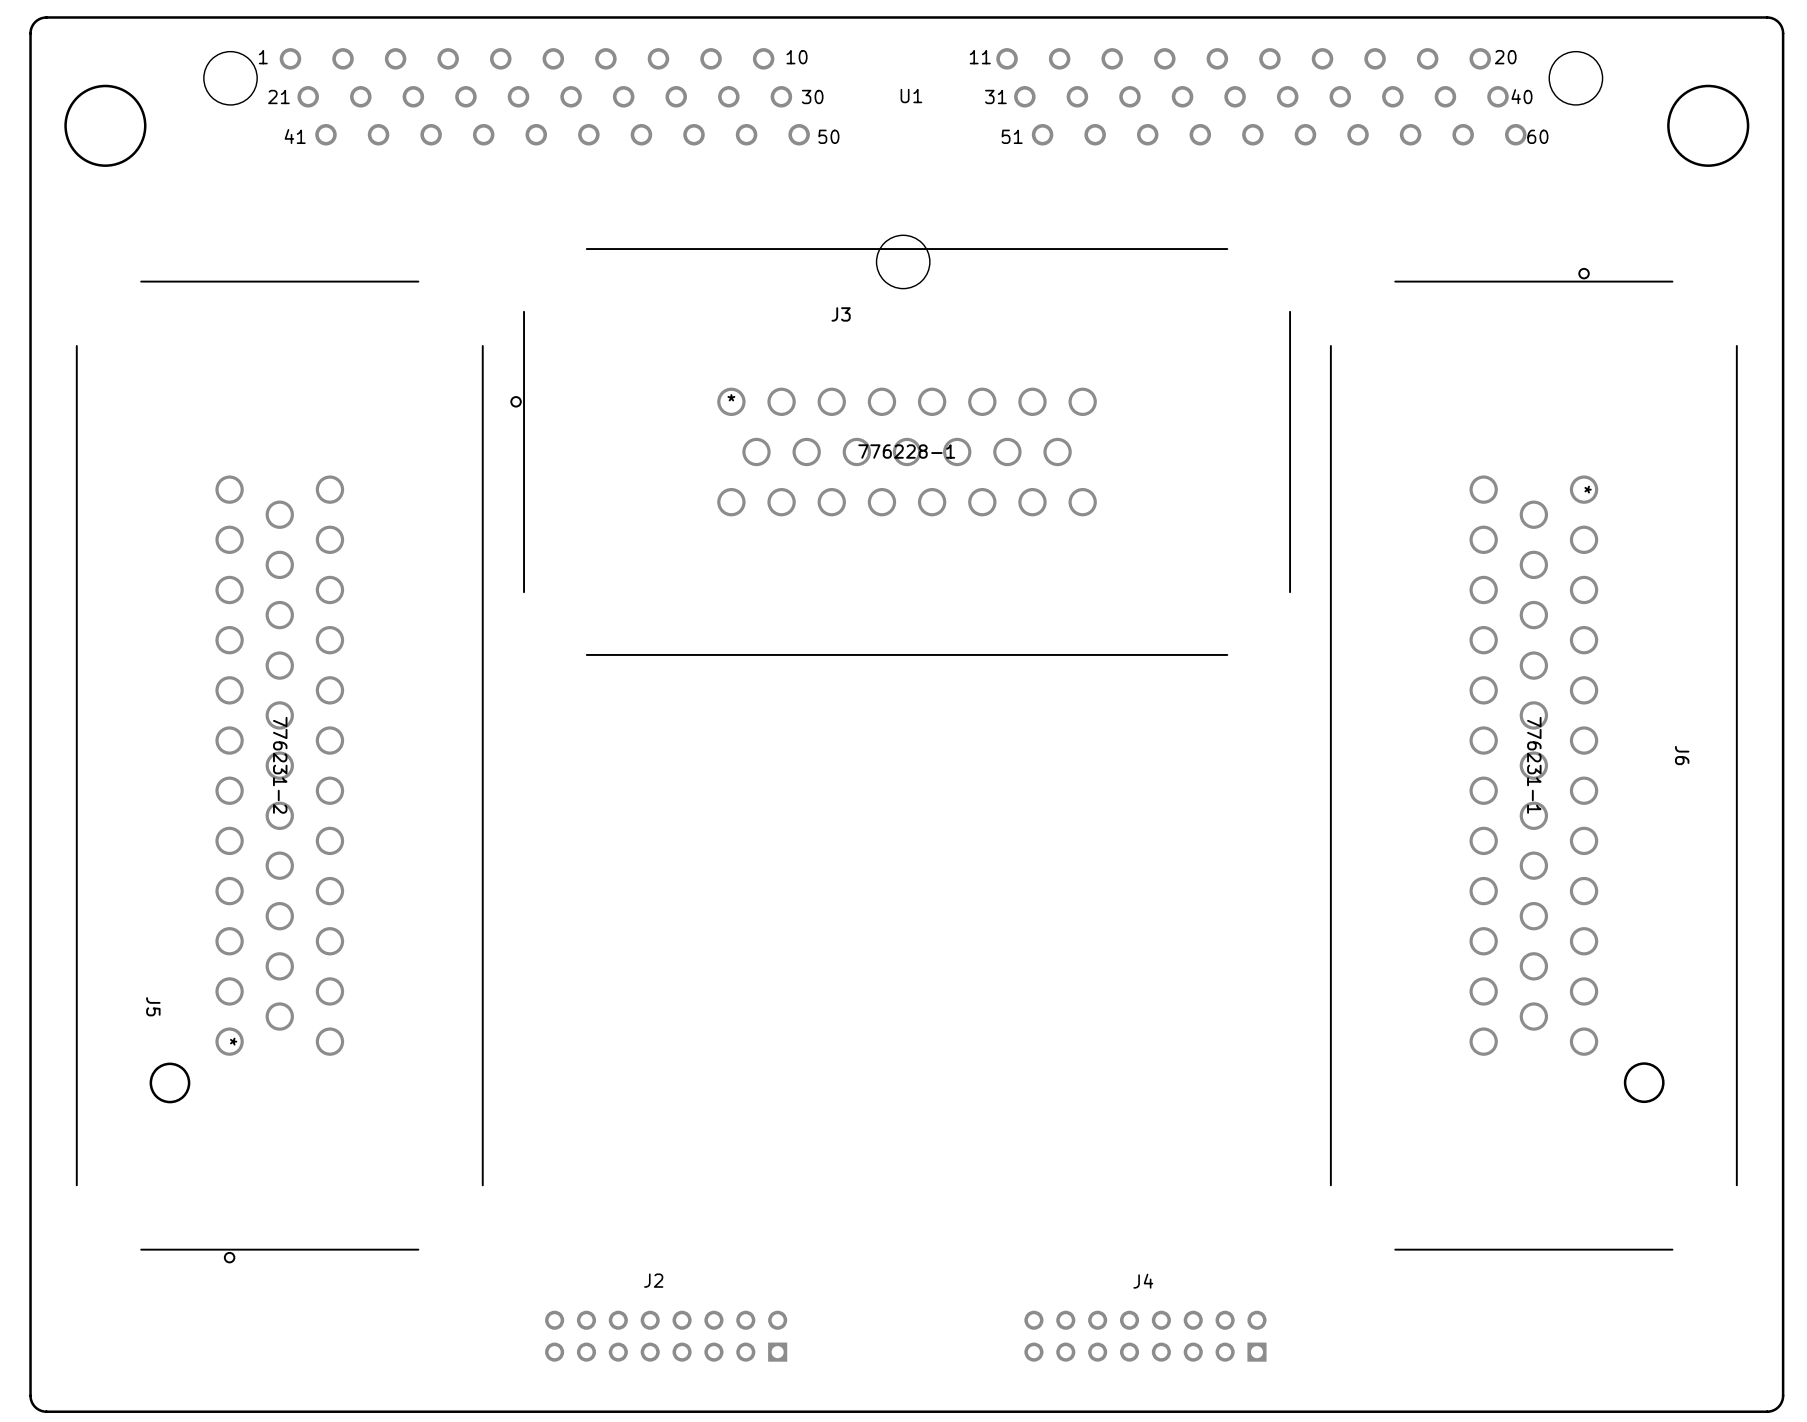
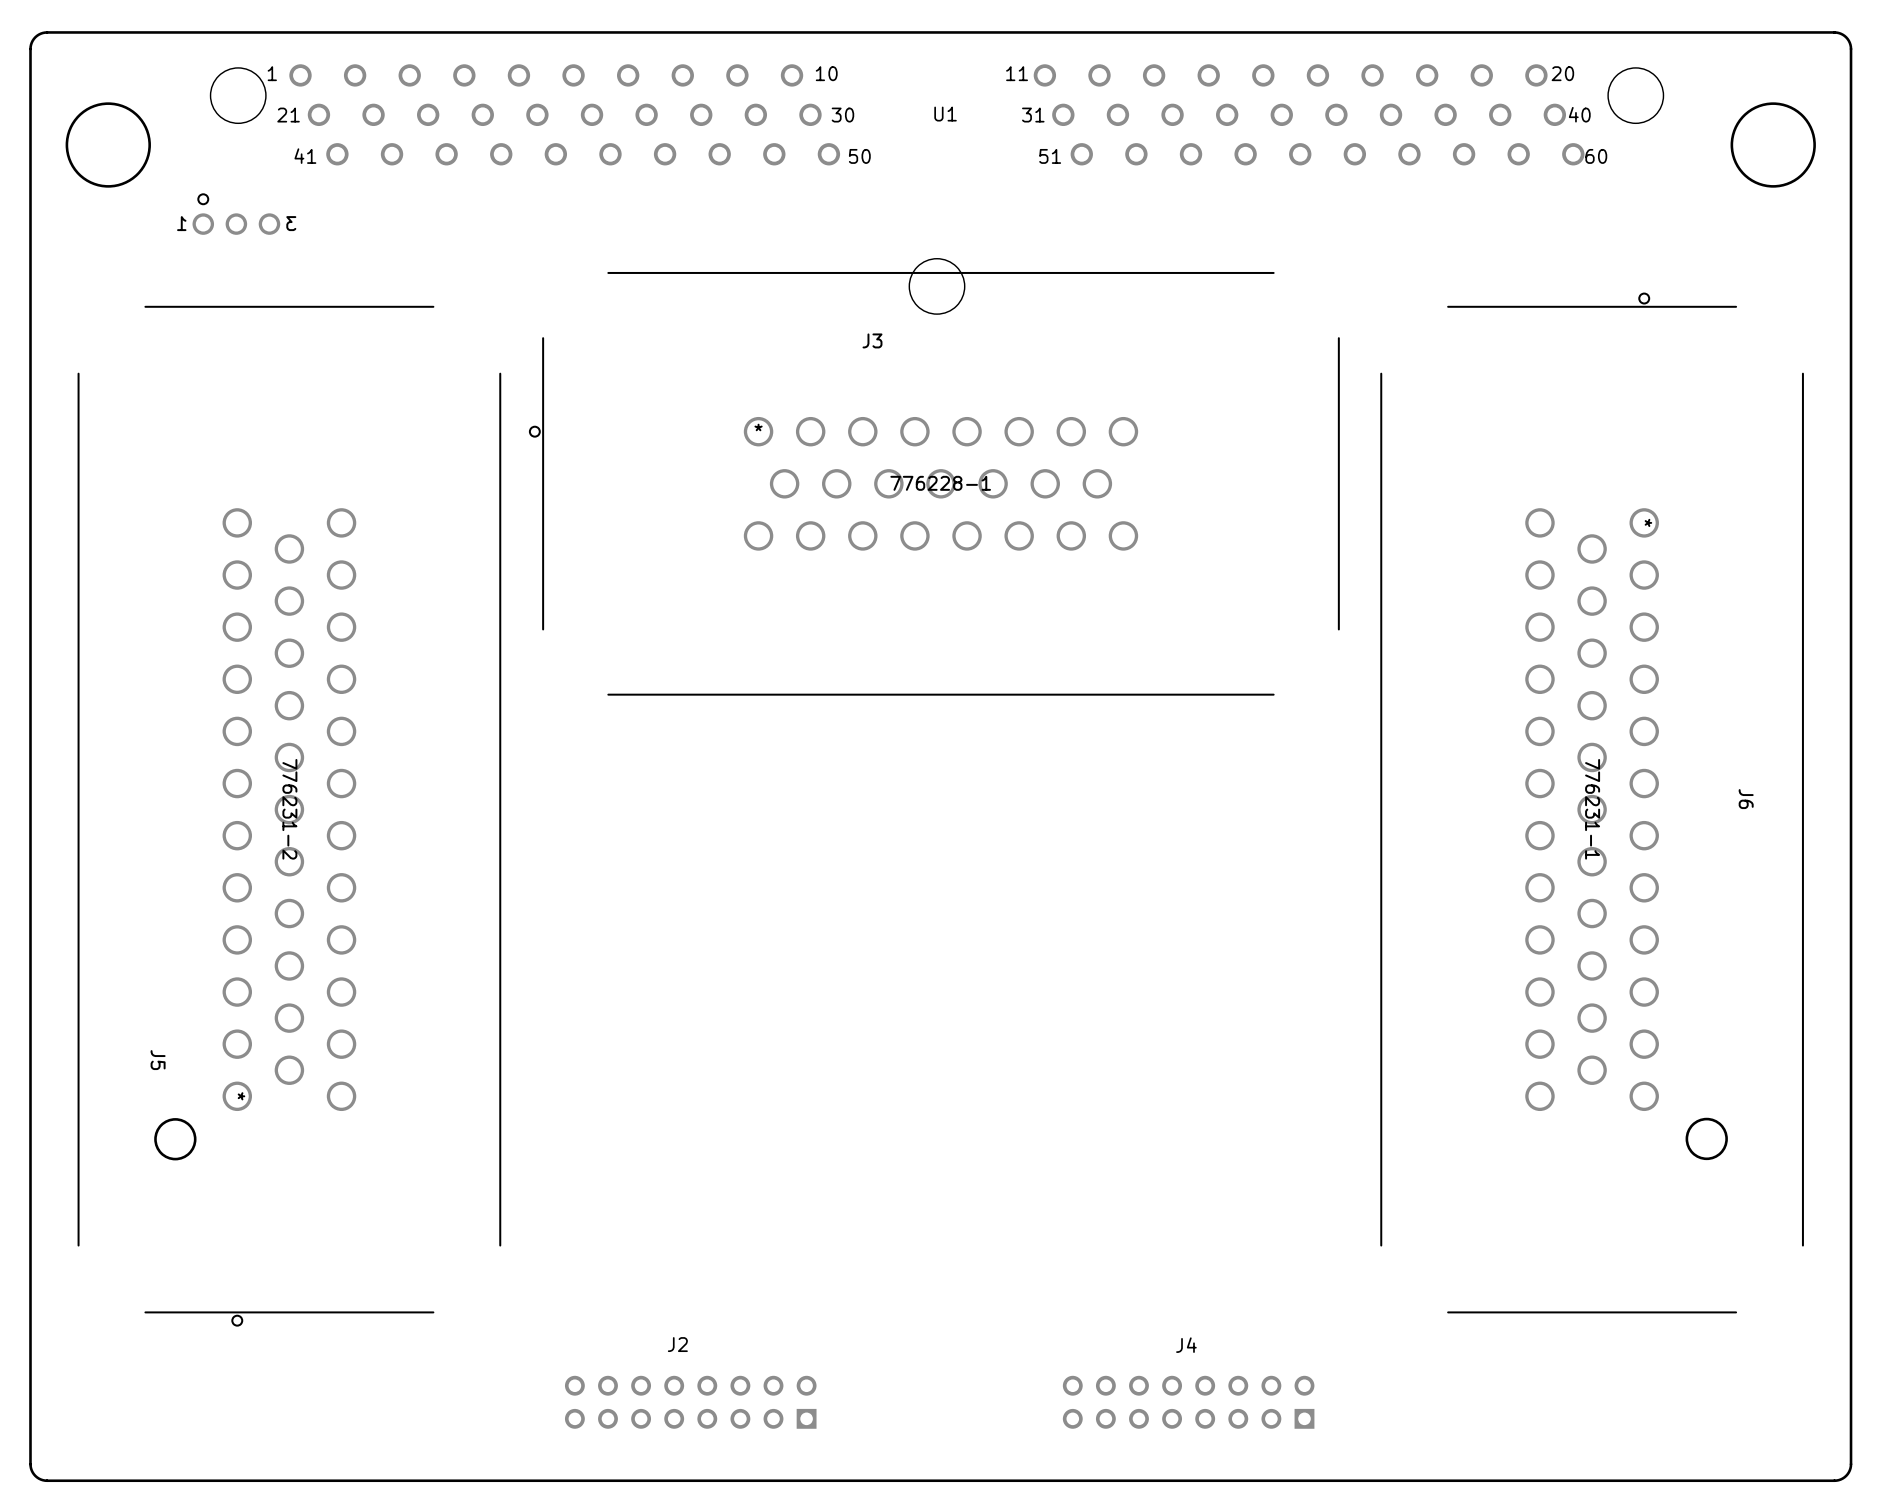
part: none -> (236, 214)

